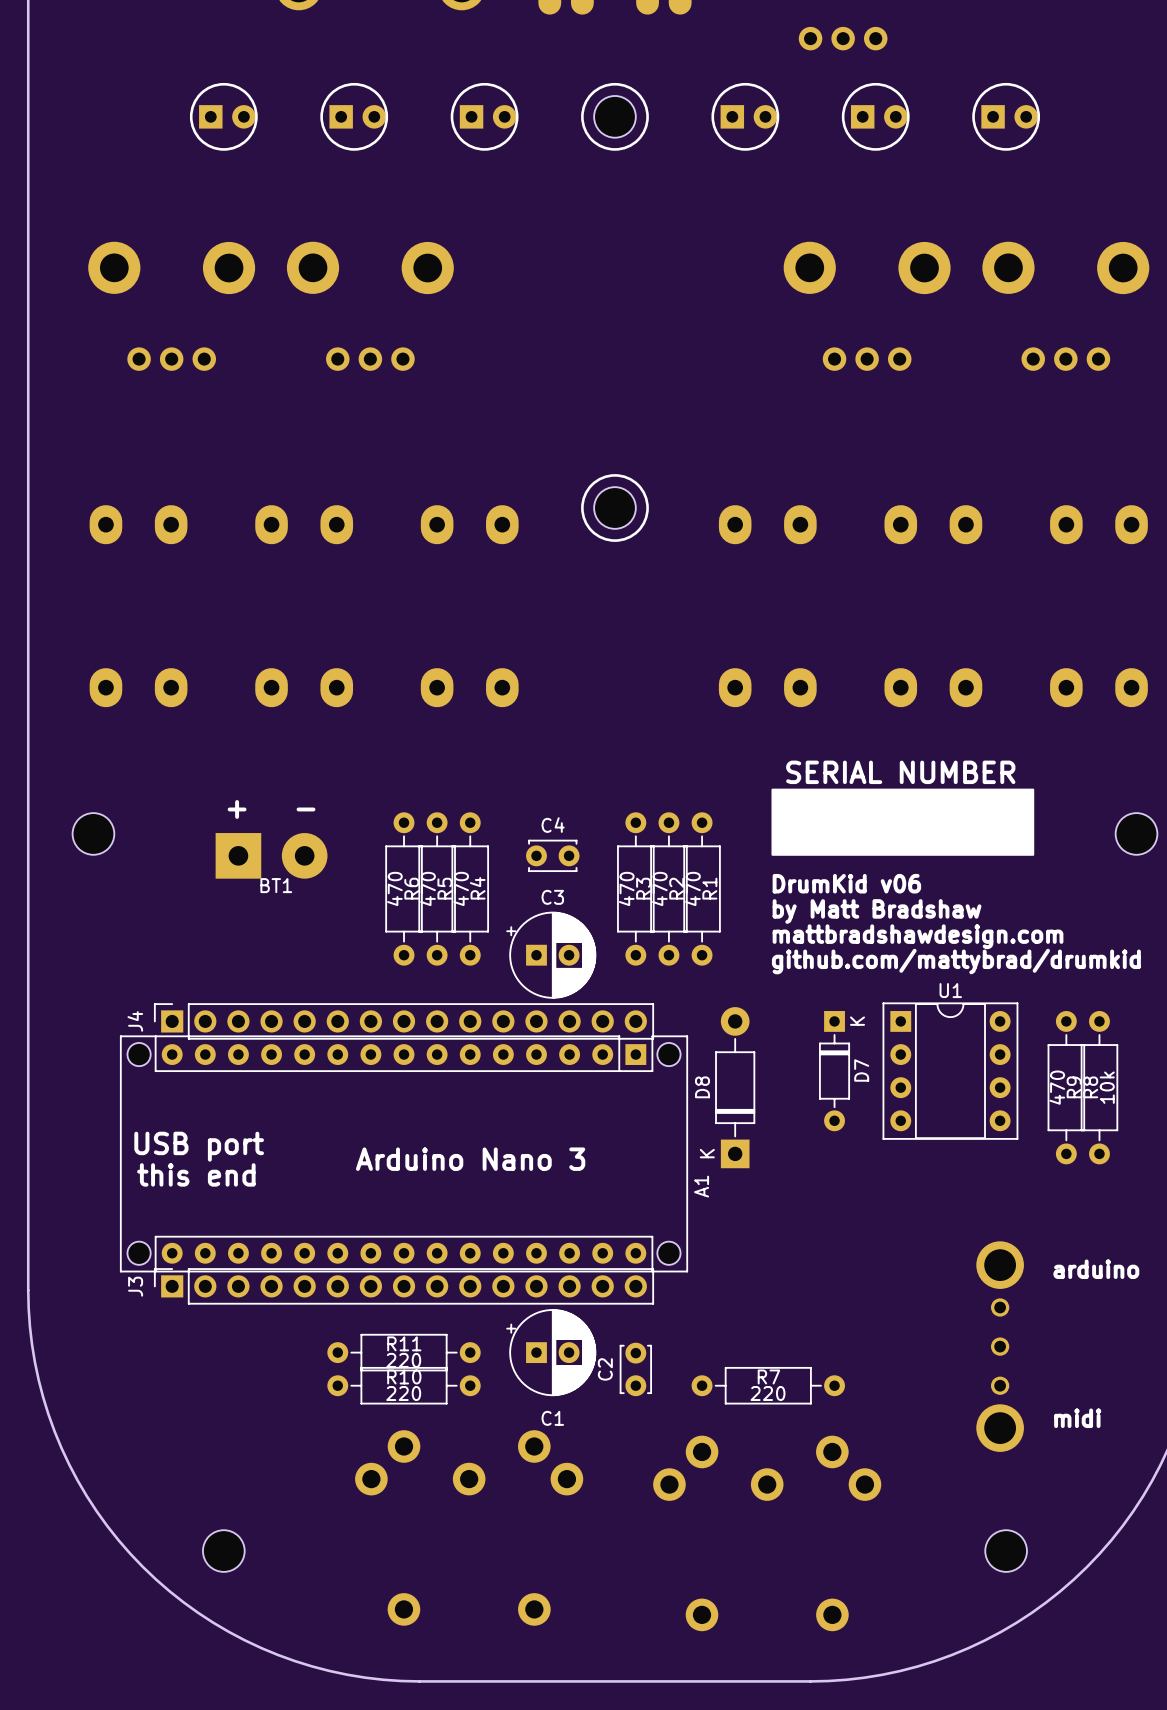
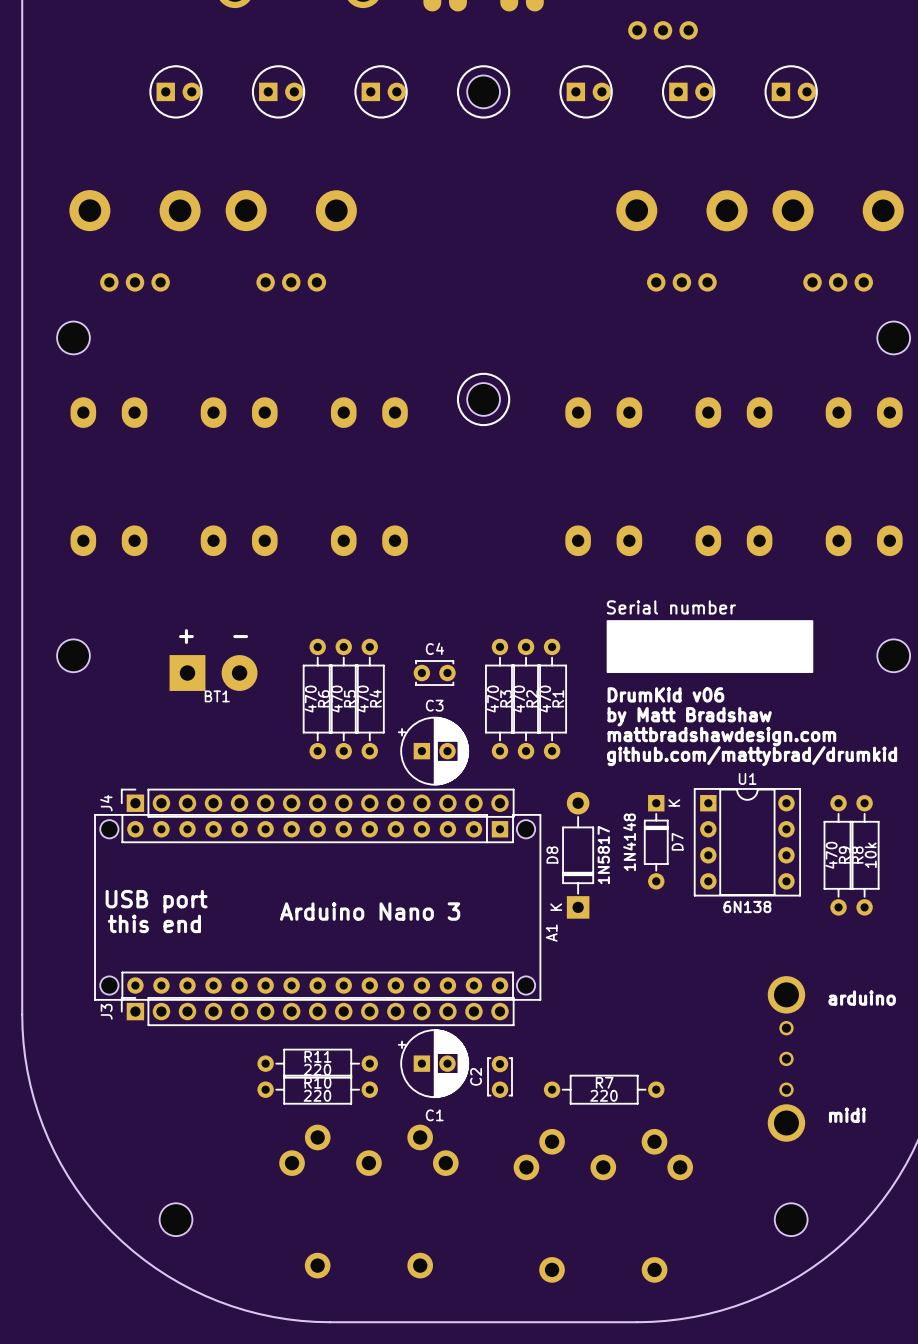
part: none -> (73, 337)
part: none -> (893, 337)
text: none -> Serial number (671, 607)
text: SERIAL NUMBER (900, 772) -> none
text: none -> 1N4148 (629, 842)
text: none -> 1N5817 (603, 855)
text: none -> 6N138 (747, 907)

